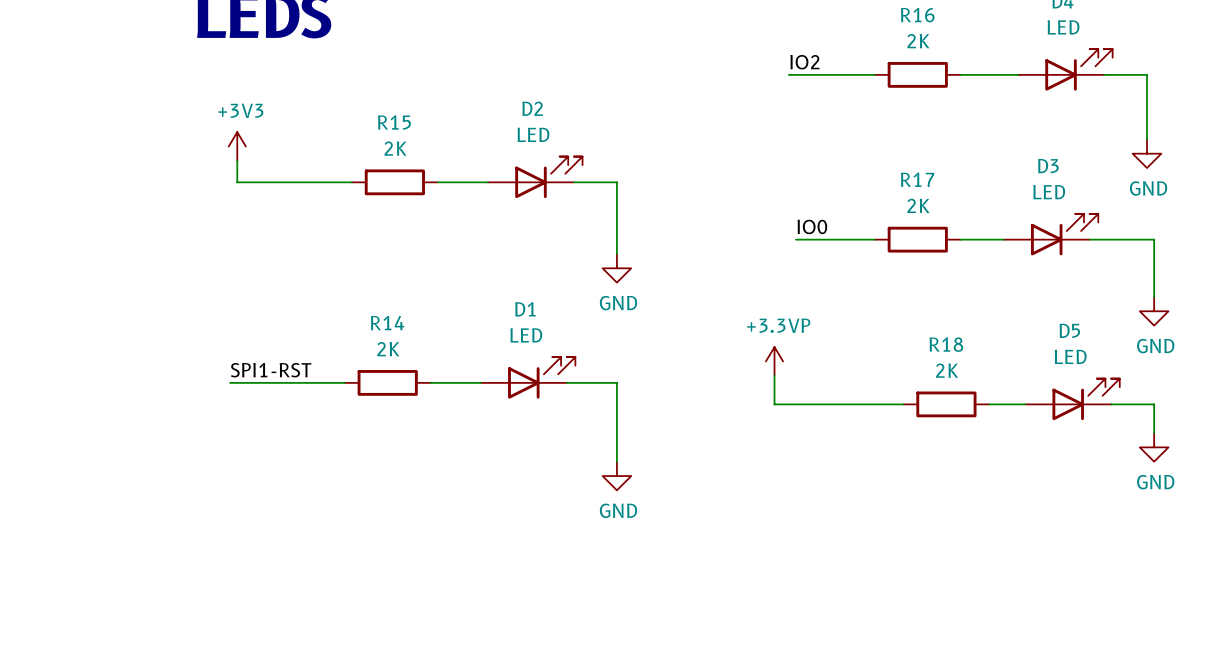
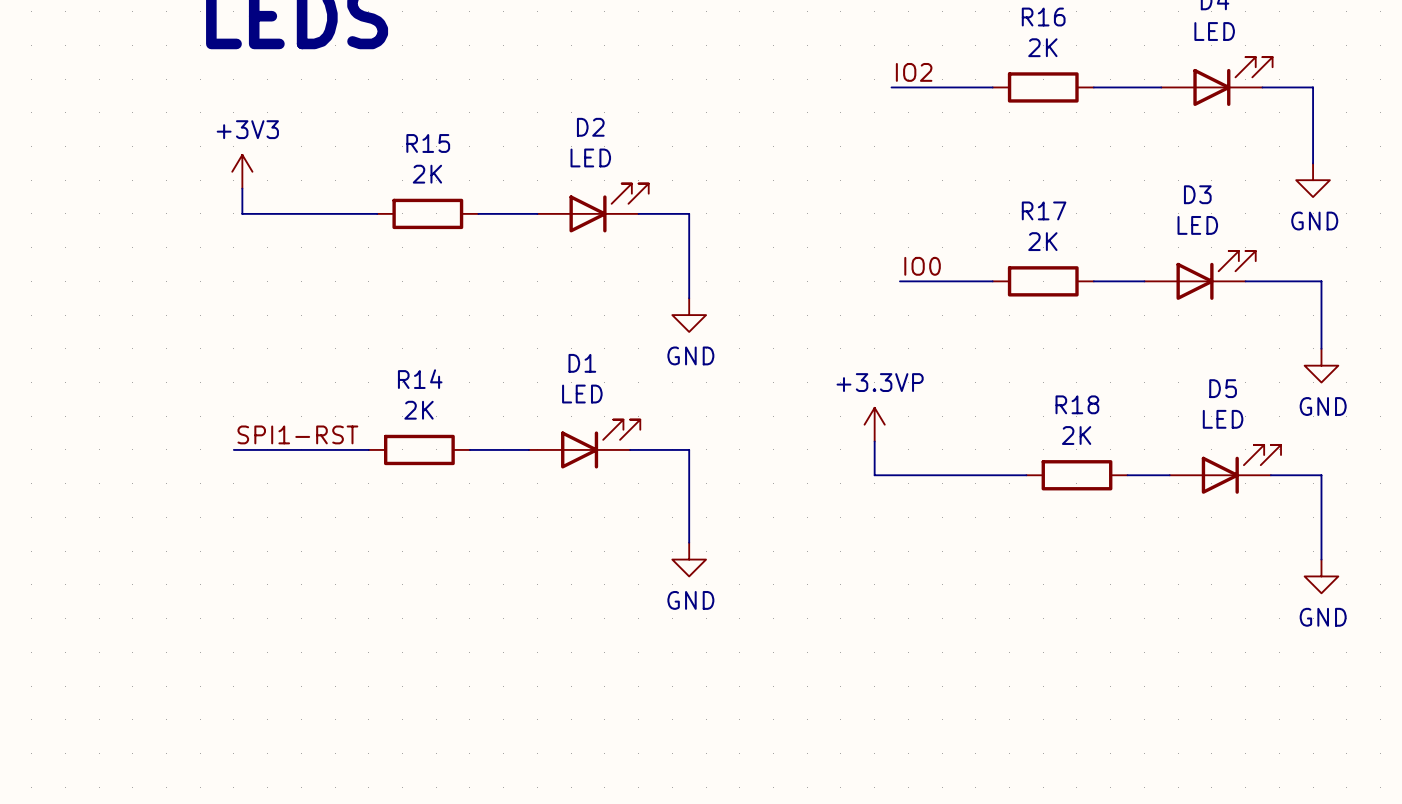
wire: none -> (1321, 508) (1321, 559)
power symbol position: GND (1154, 447) -> GND (1321, 576)

